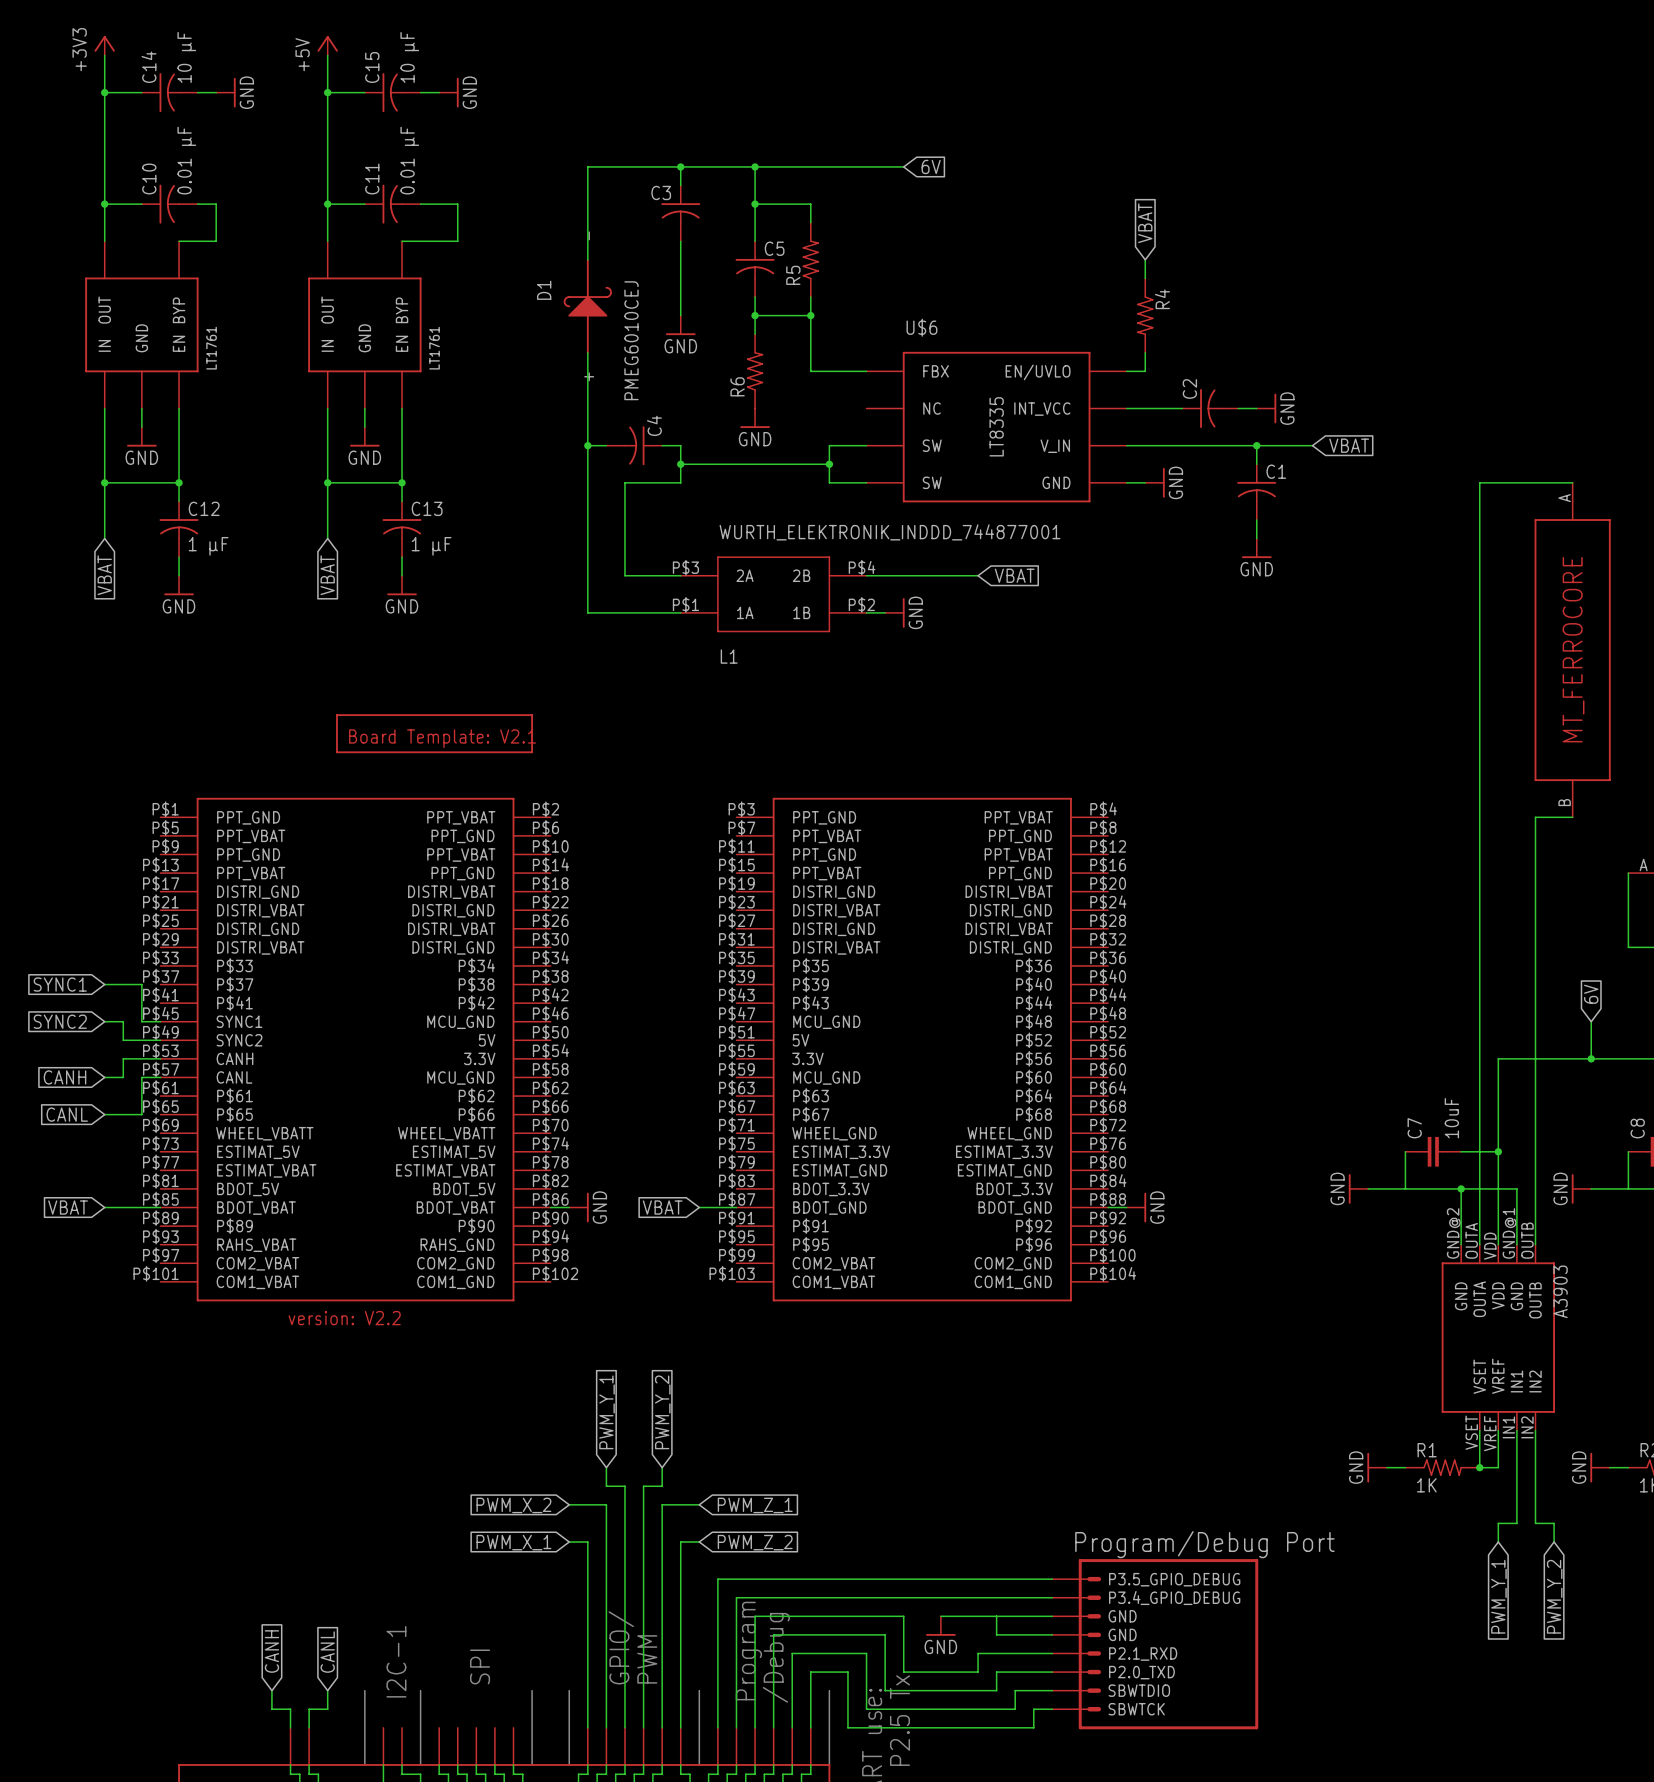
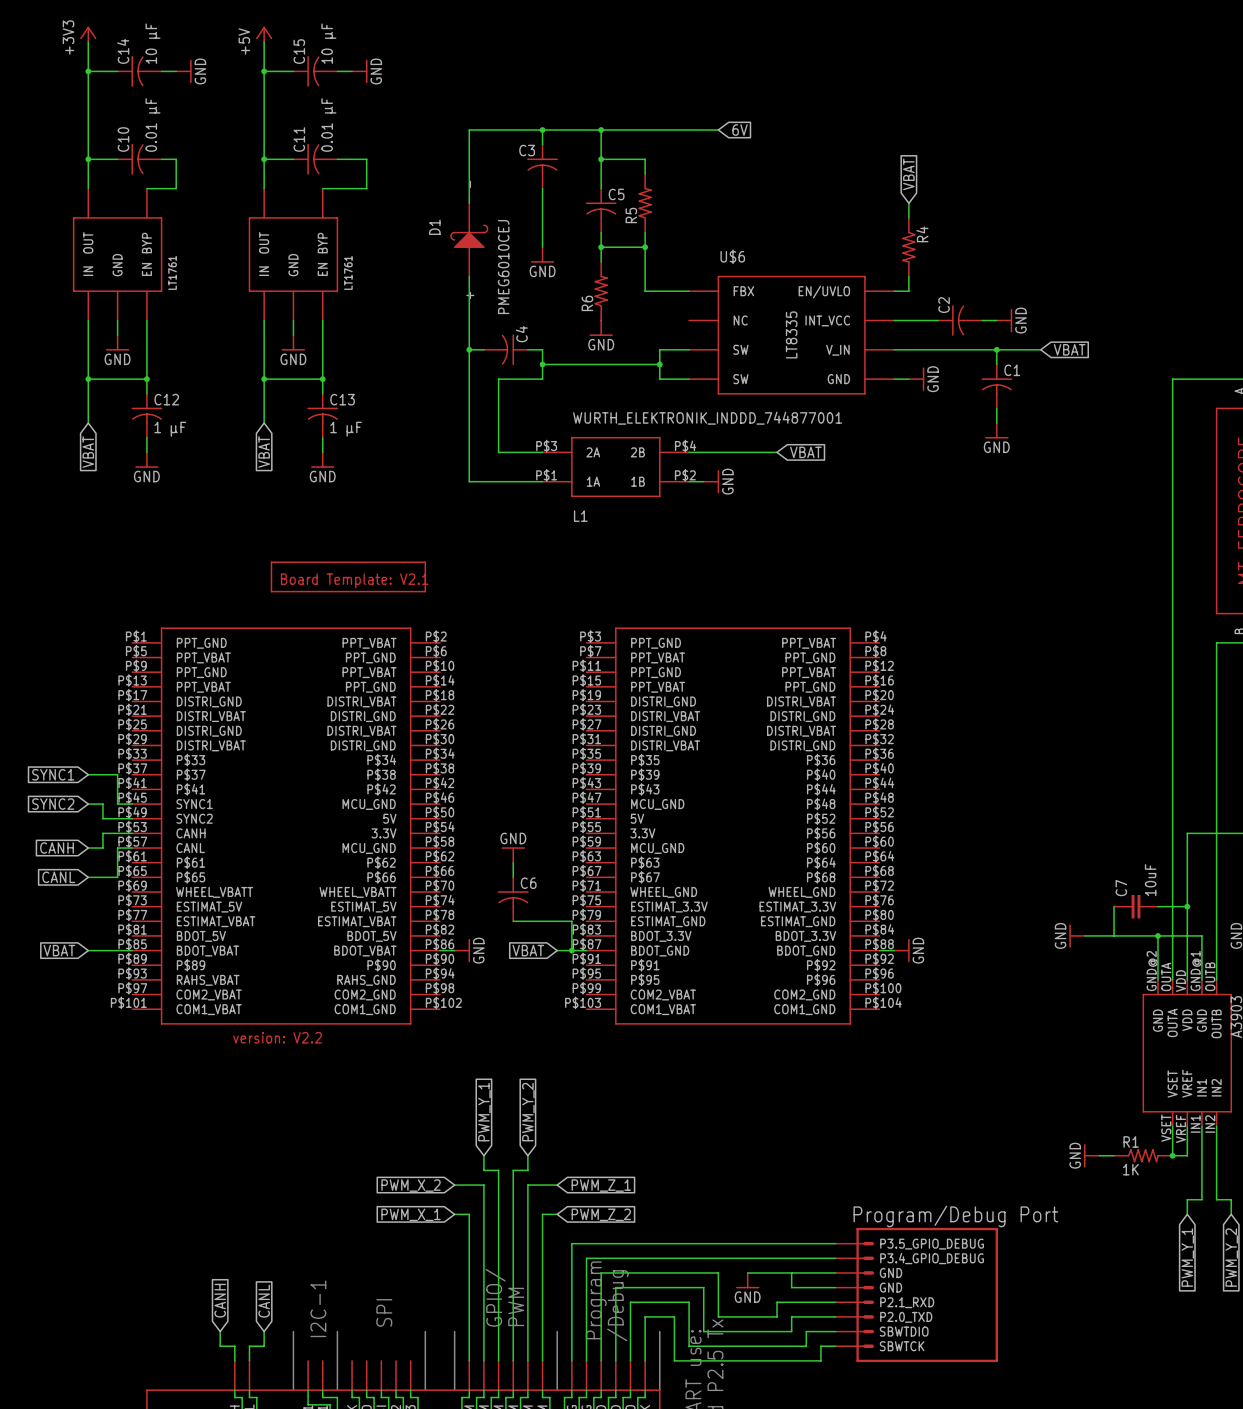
power symbol: none -> GND (513, 854)
wire: none -> (513, 862) (513, 877)
C6: none -> (513, 899)
wire: none -> (513, 921) (571, 921) (571, 950)
junction: none -> (571, 950)

